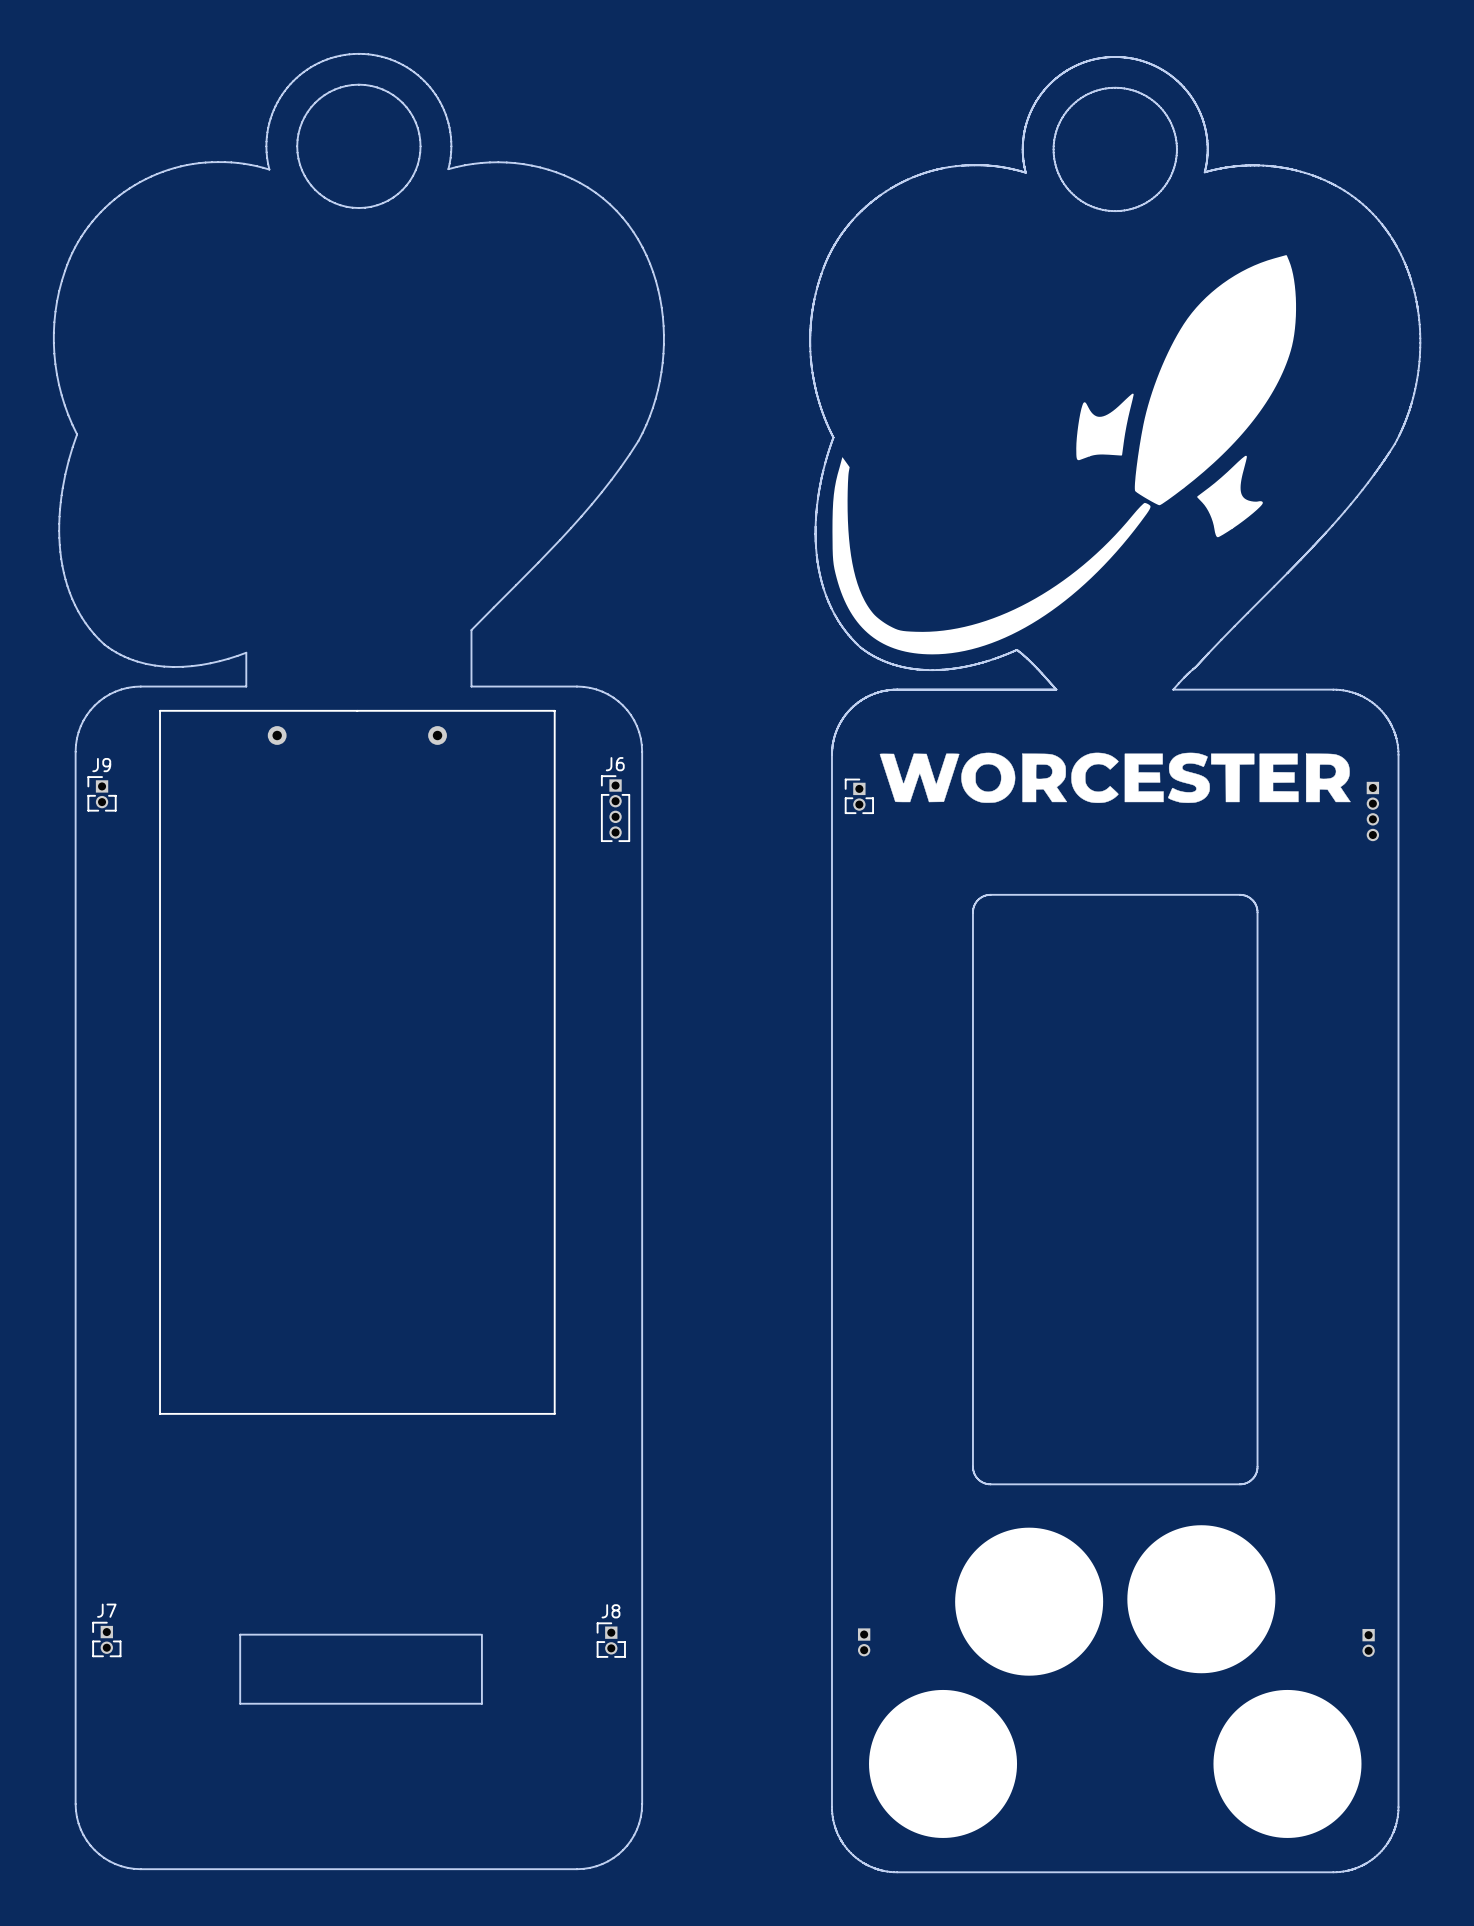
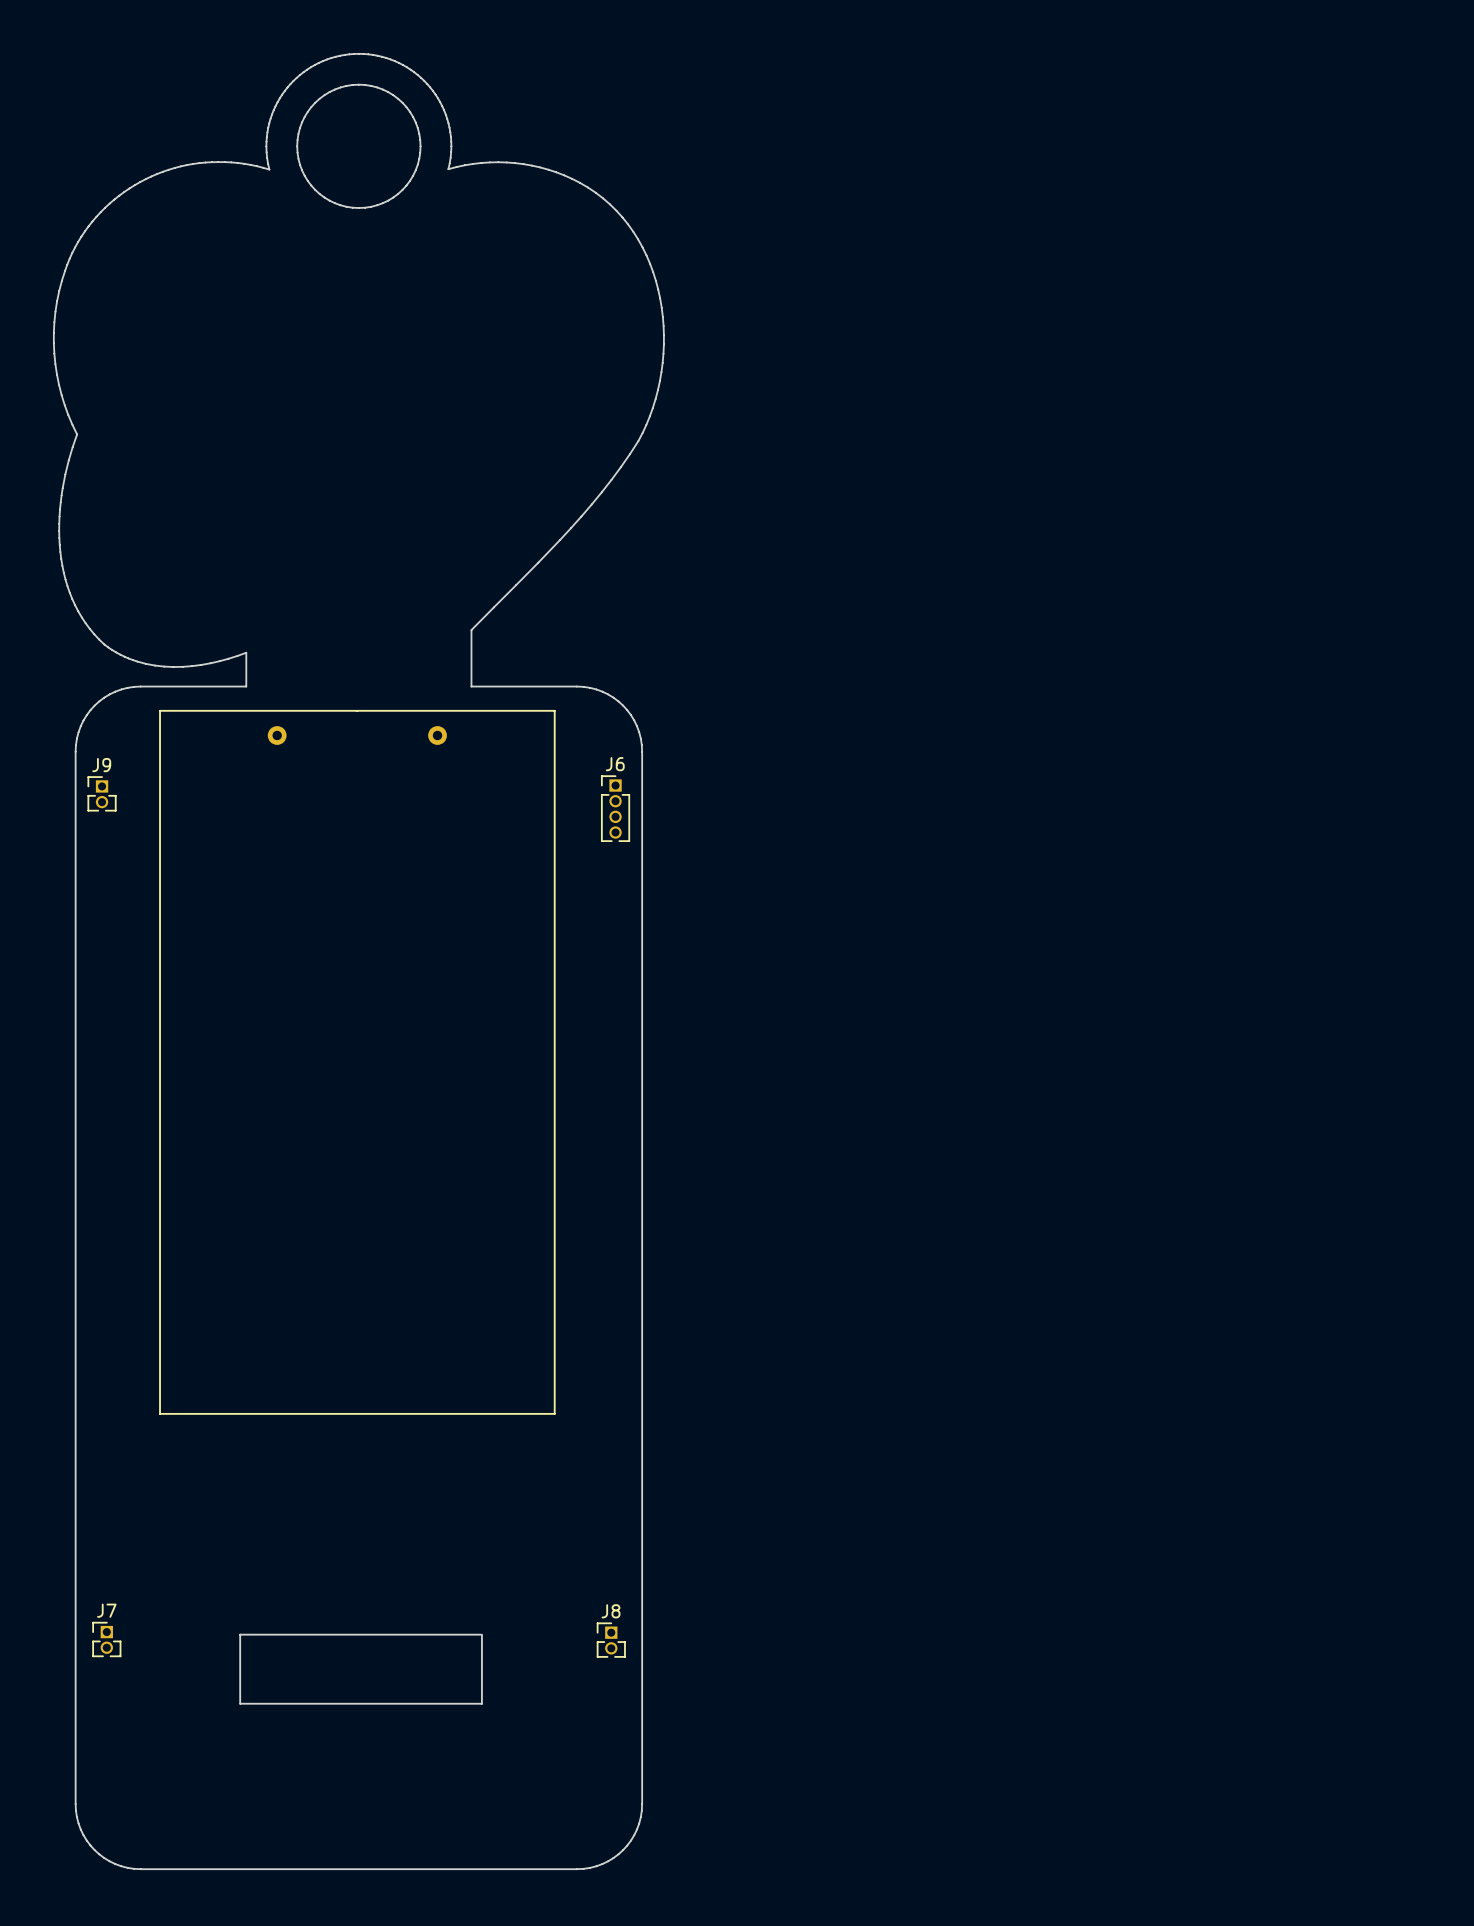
drawing: [809, 56, 1421, 1873] -> none
part: (859, 796) -> none
part: (1372, 811) -> none
part: (864, 1642) -> none
part: (1368, 1642) -> none

